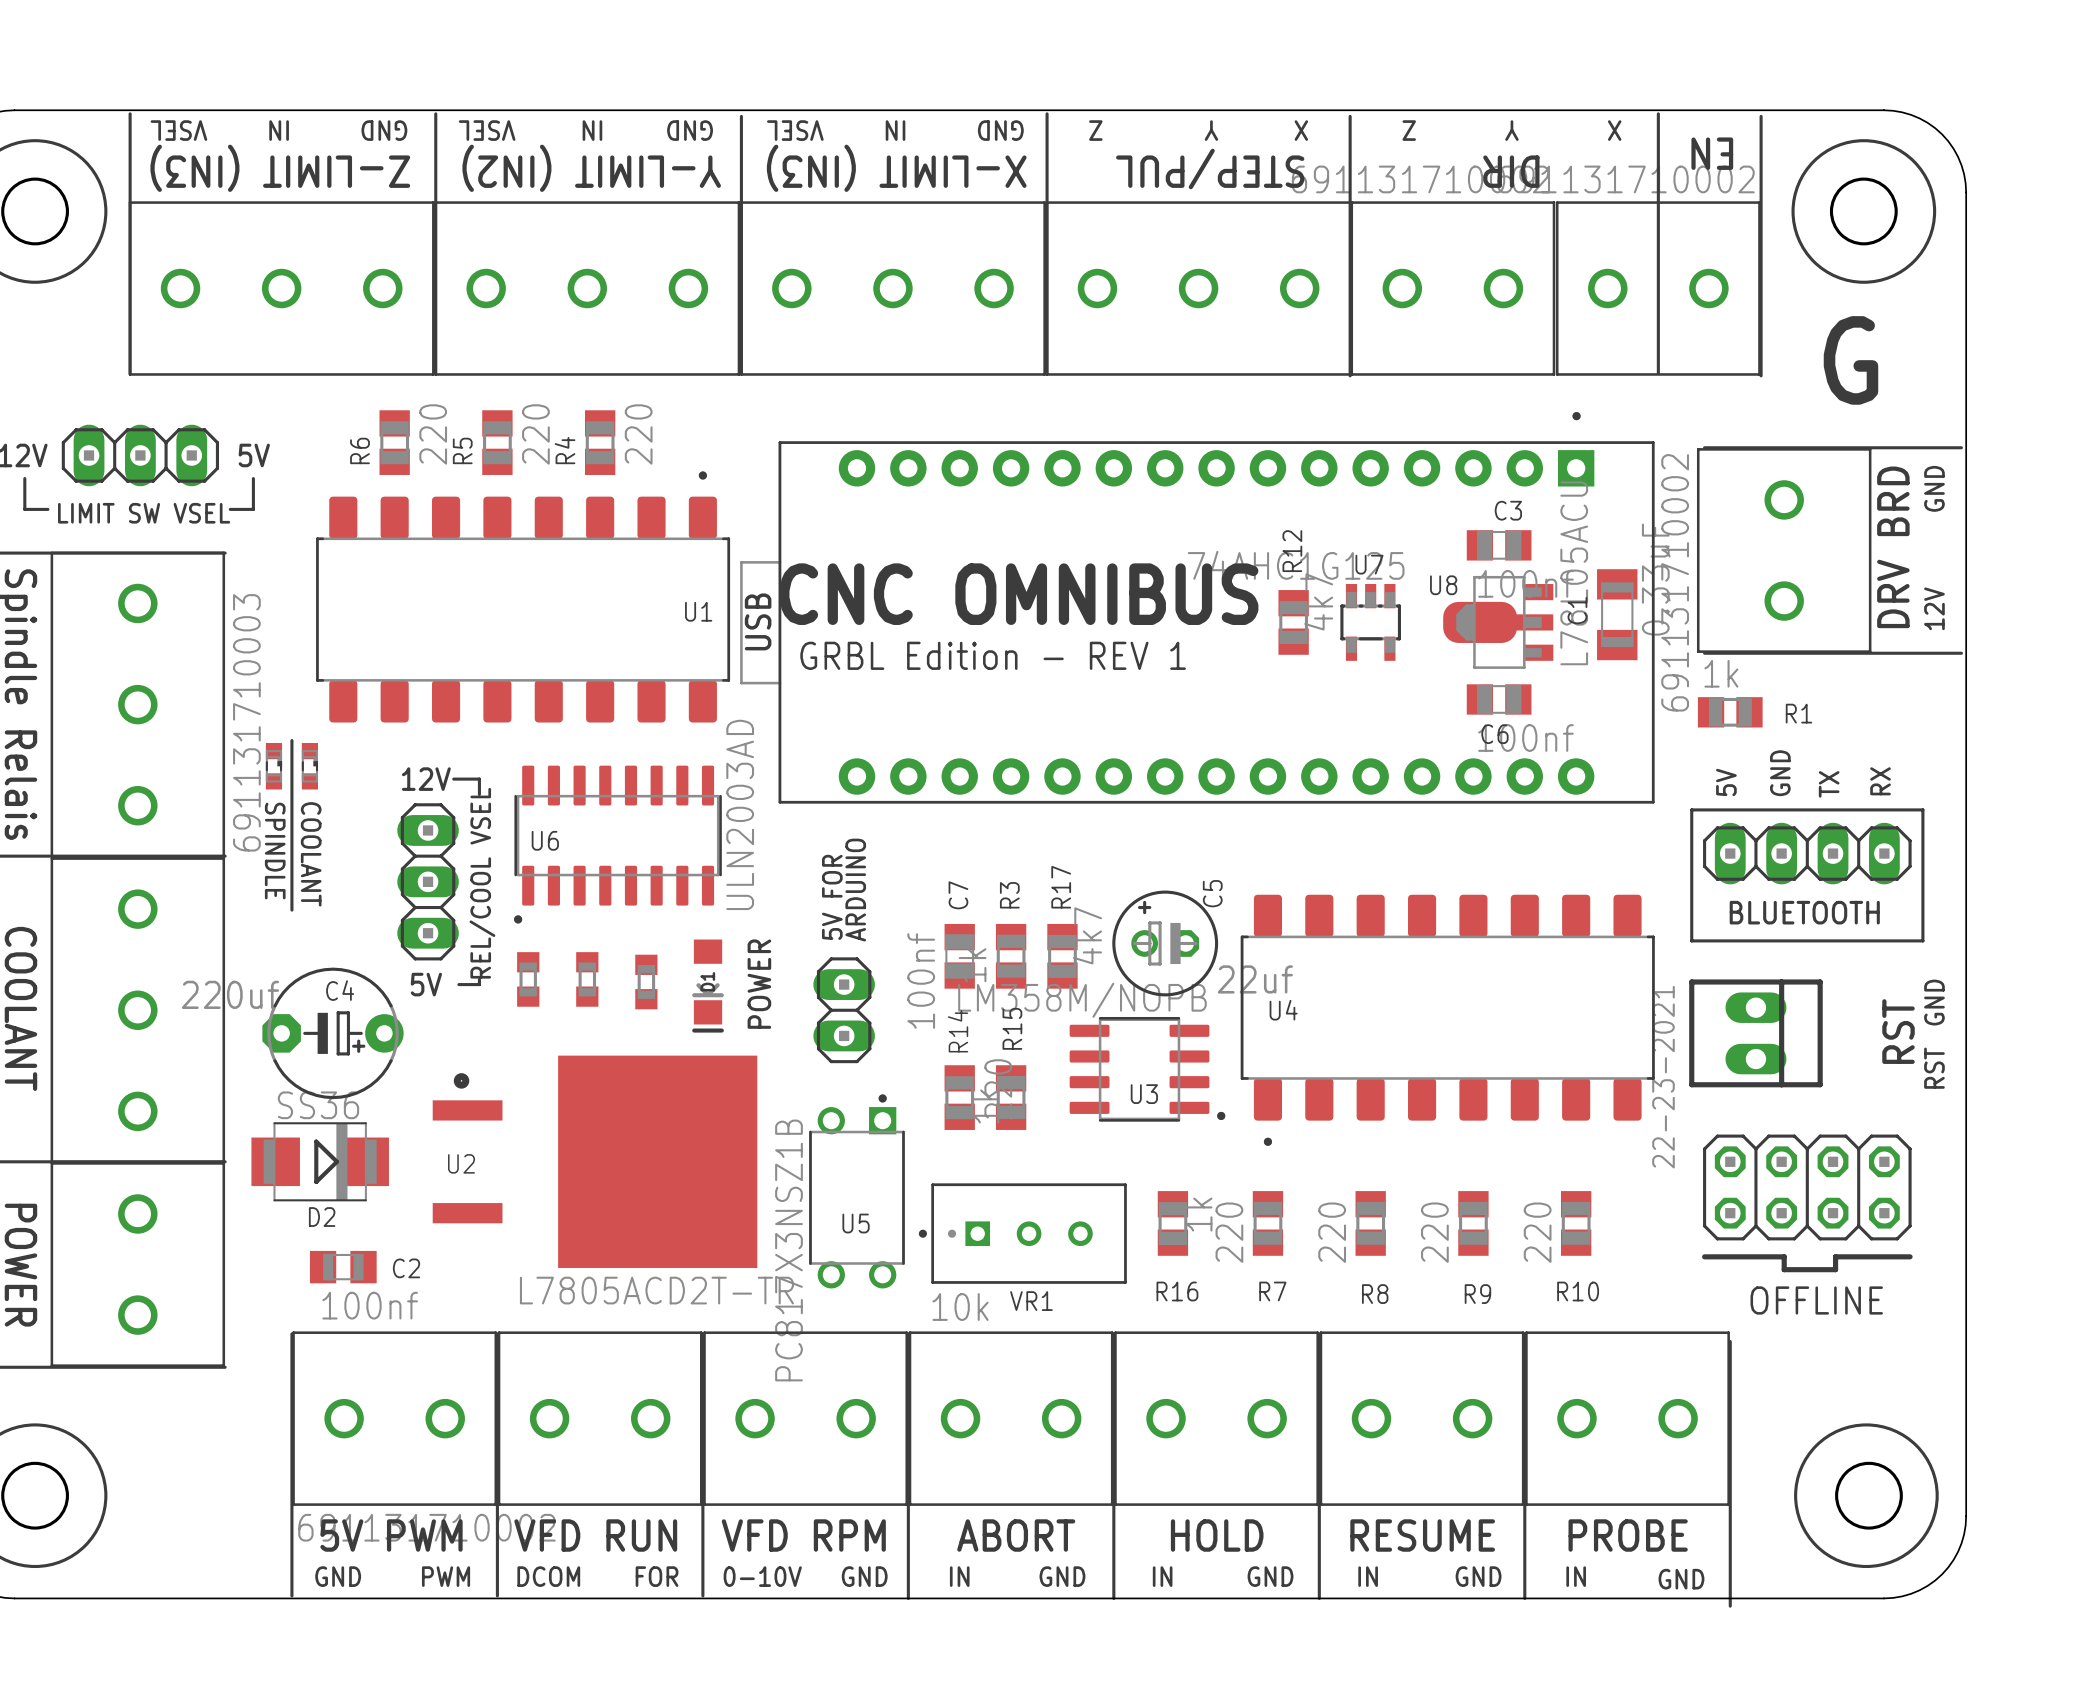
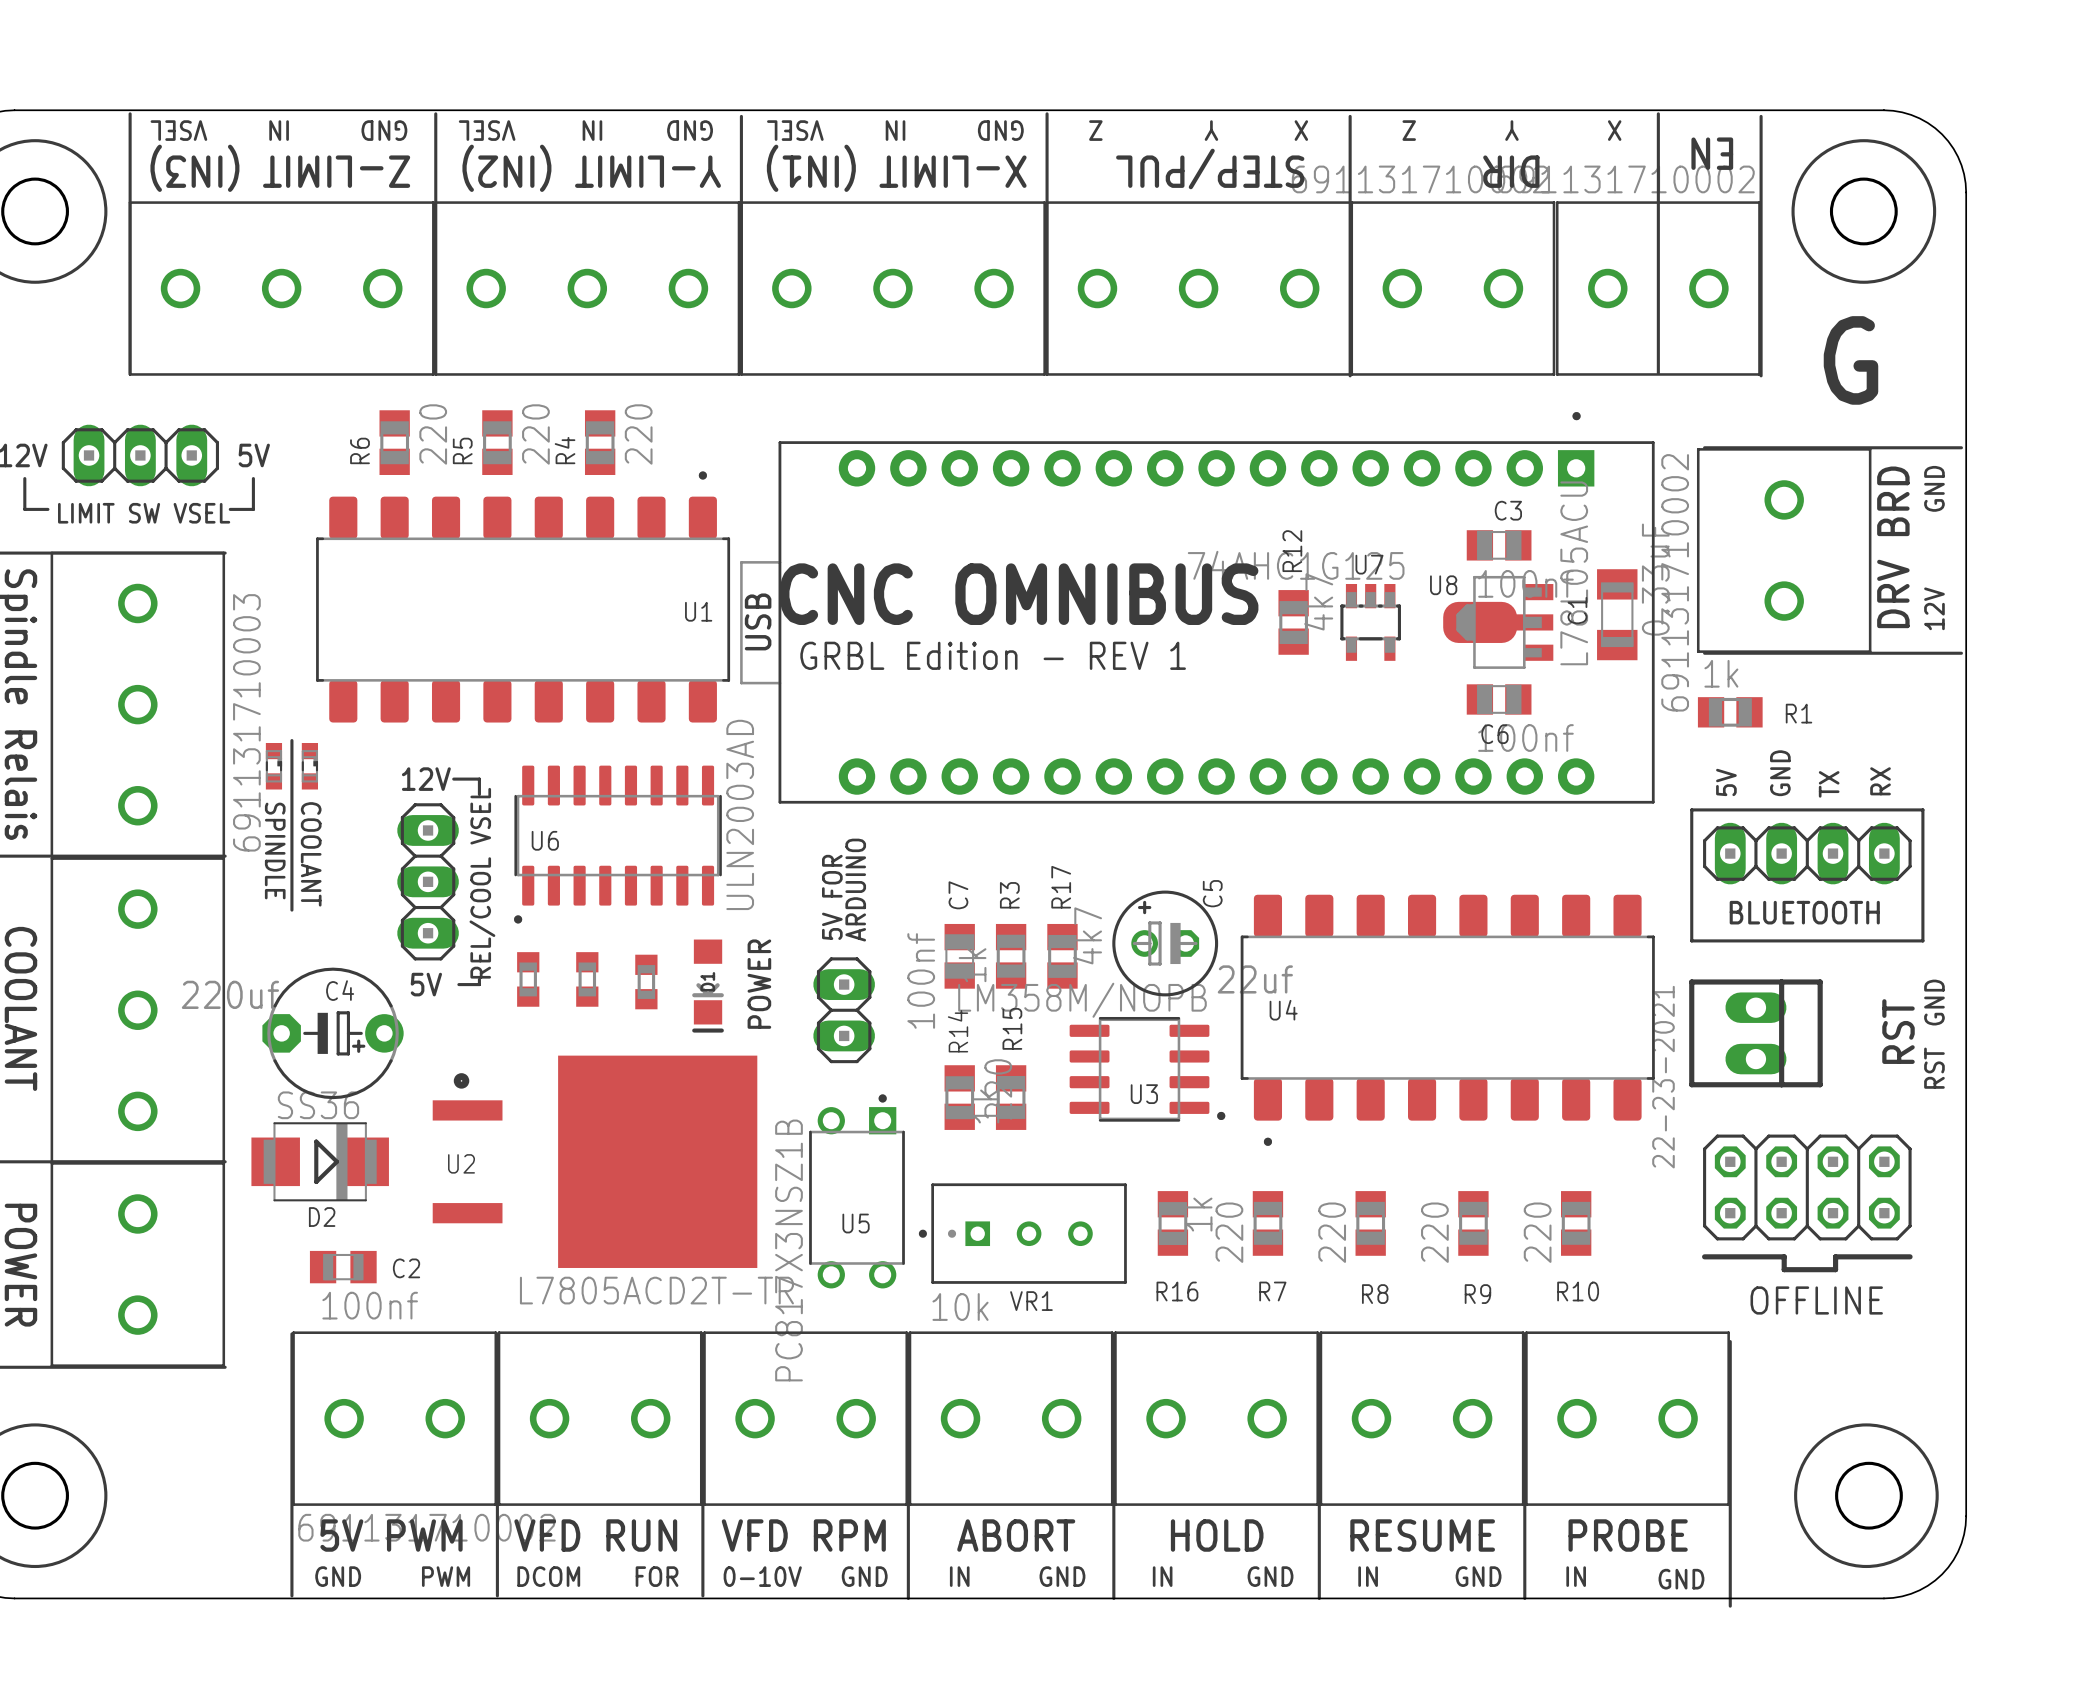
text: X-LIMIT (IN3) (896, 168) -> X-LIMIT (IN1) (896, 168)

